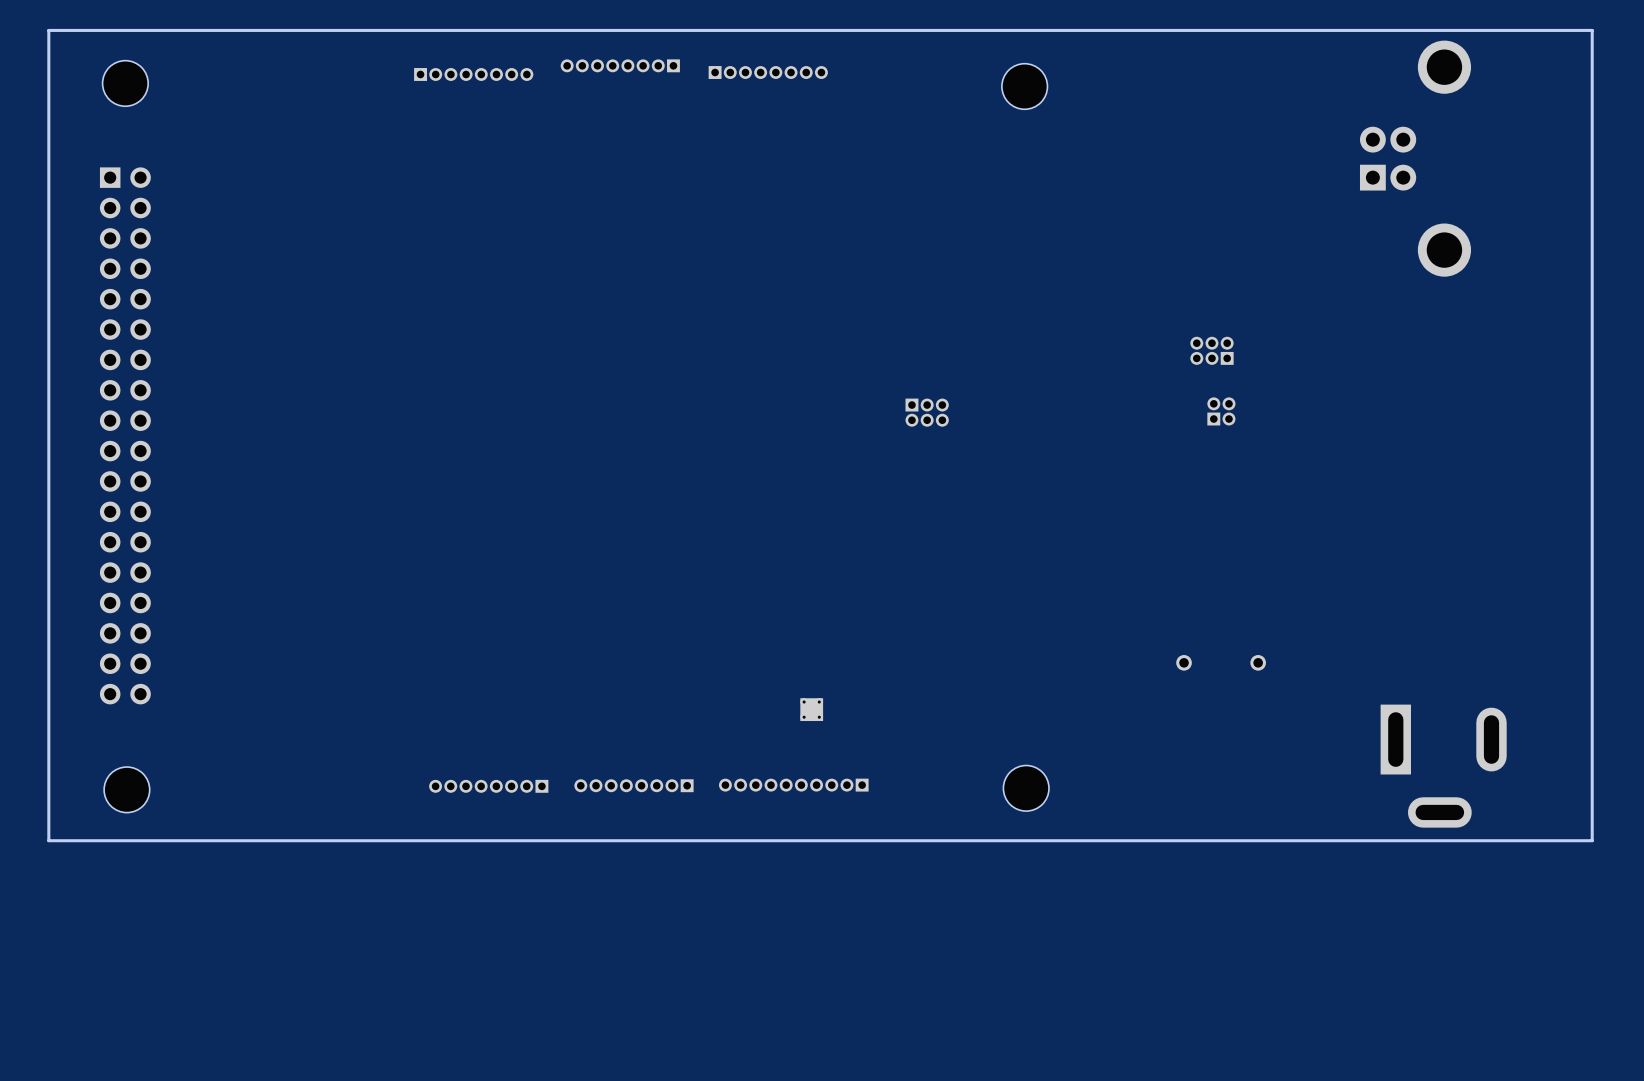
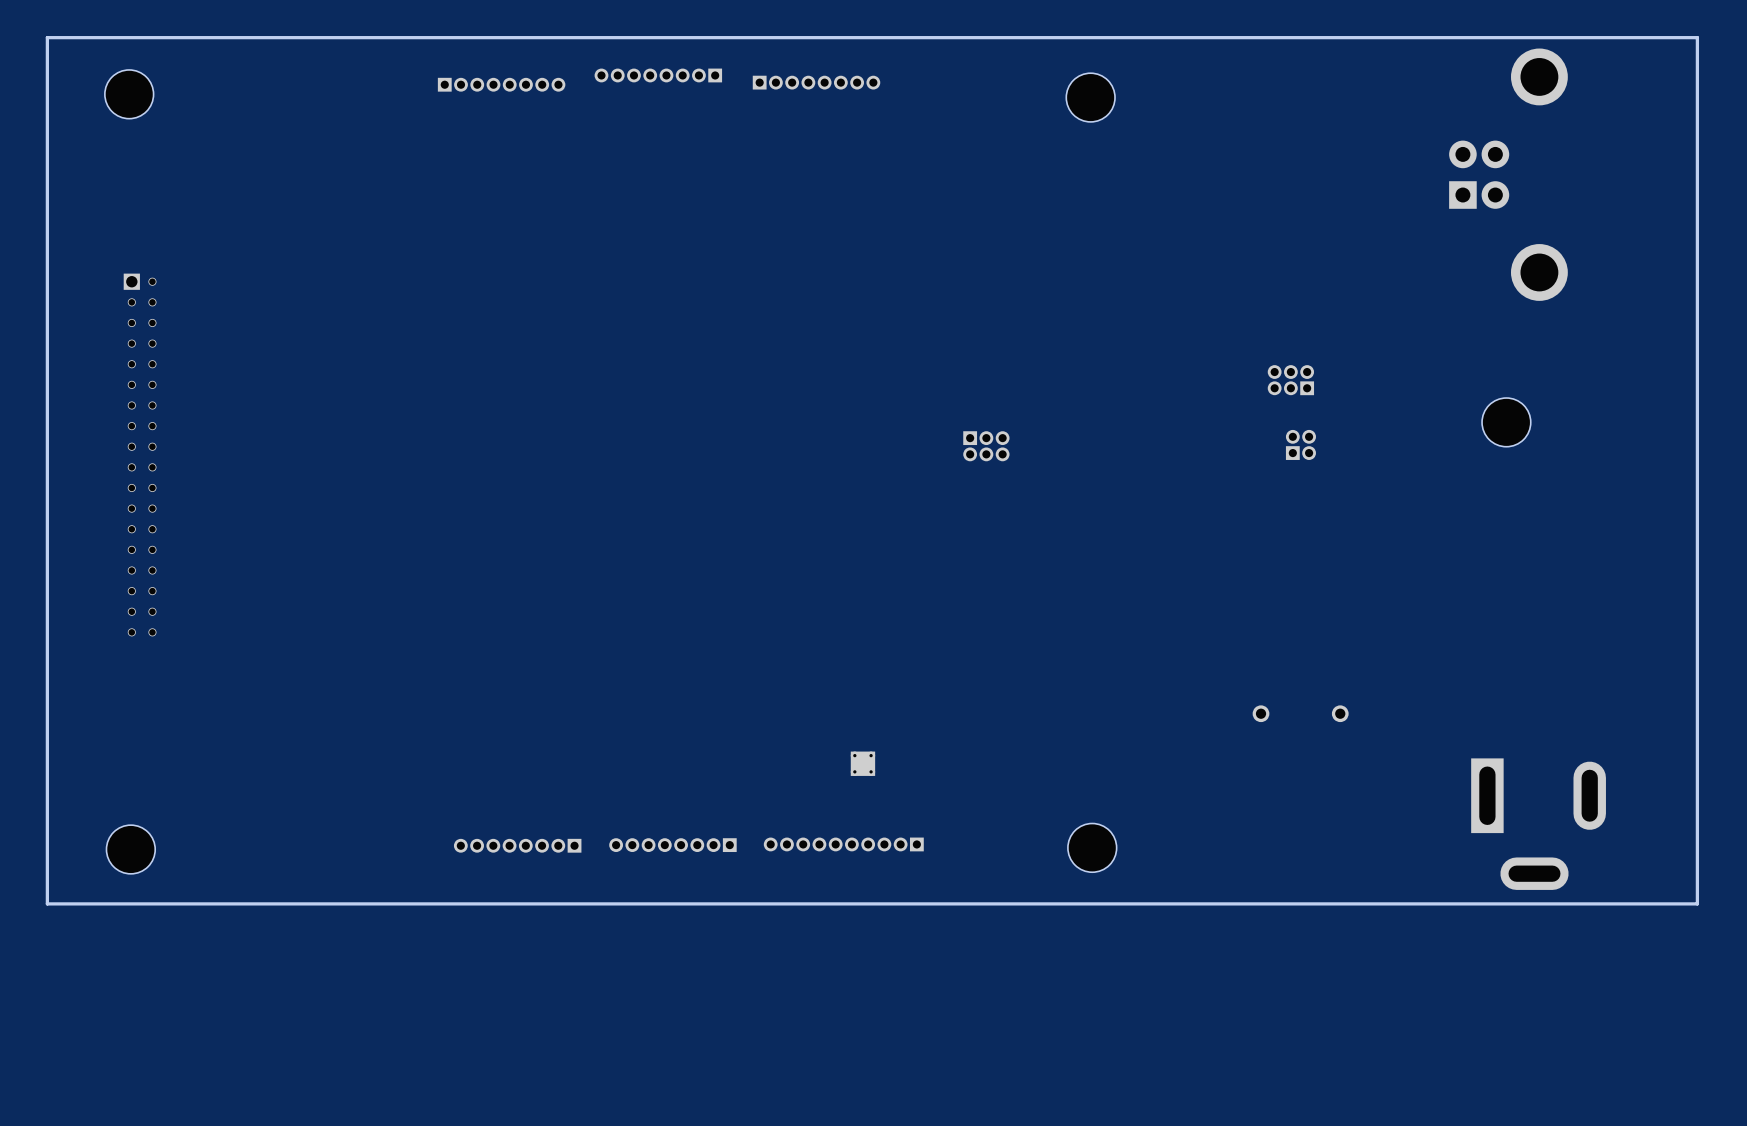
part: none -> (1506, 422)
part: none -> (140, 455)
part: (125, 435) -> none

